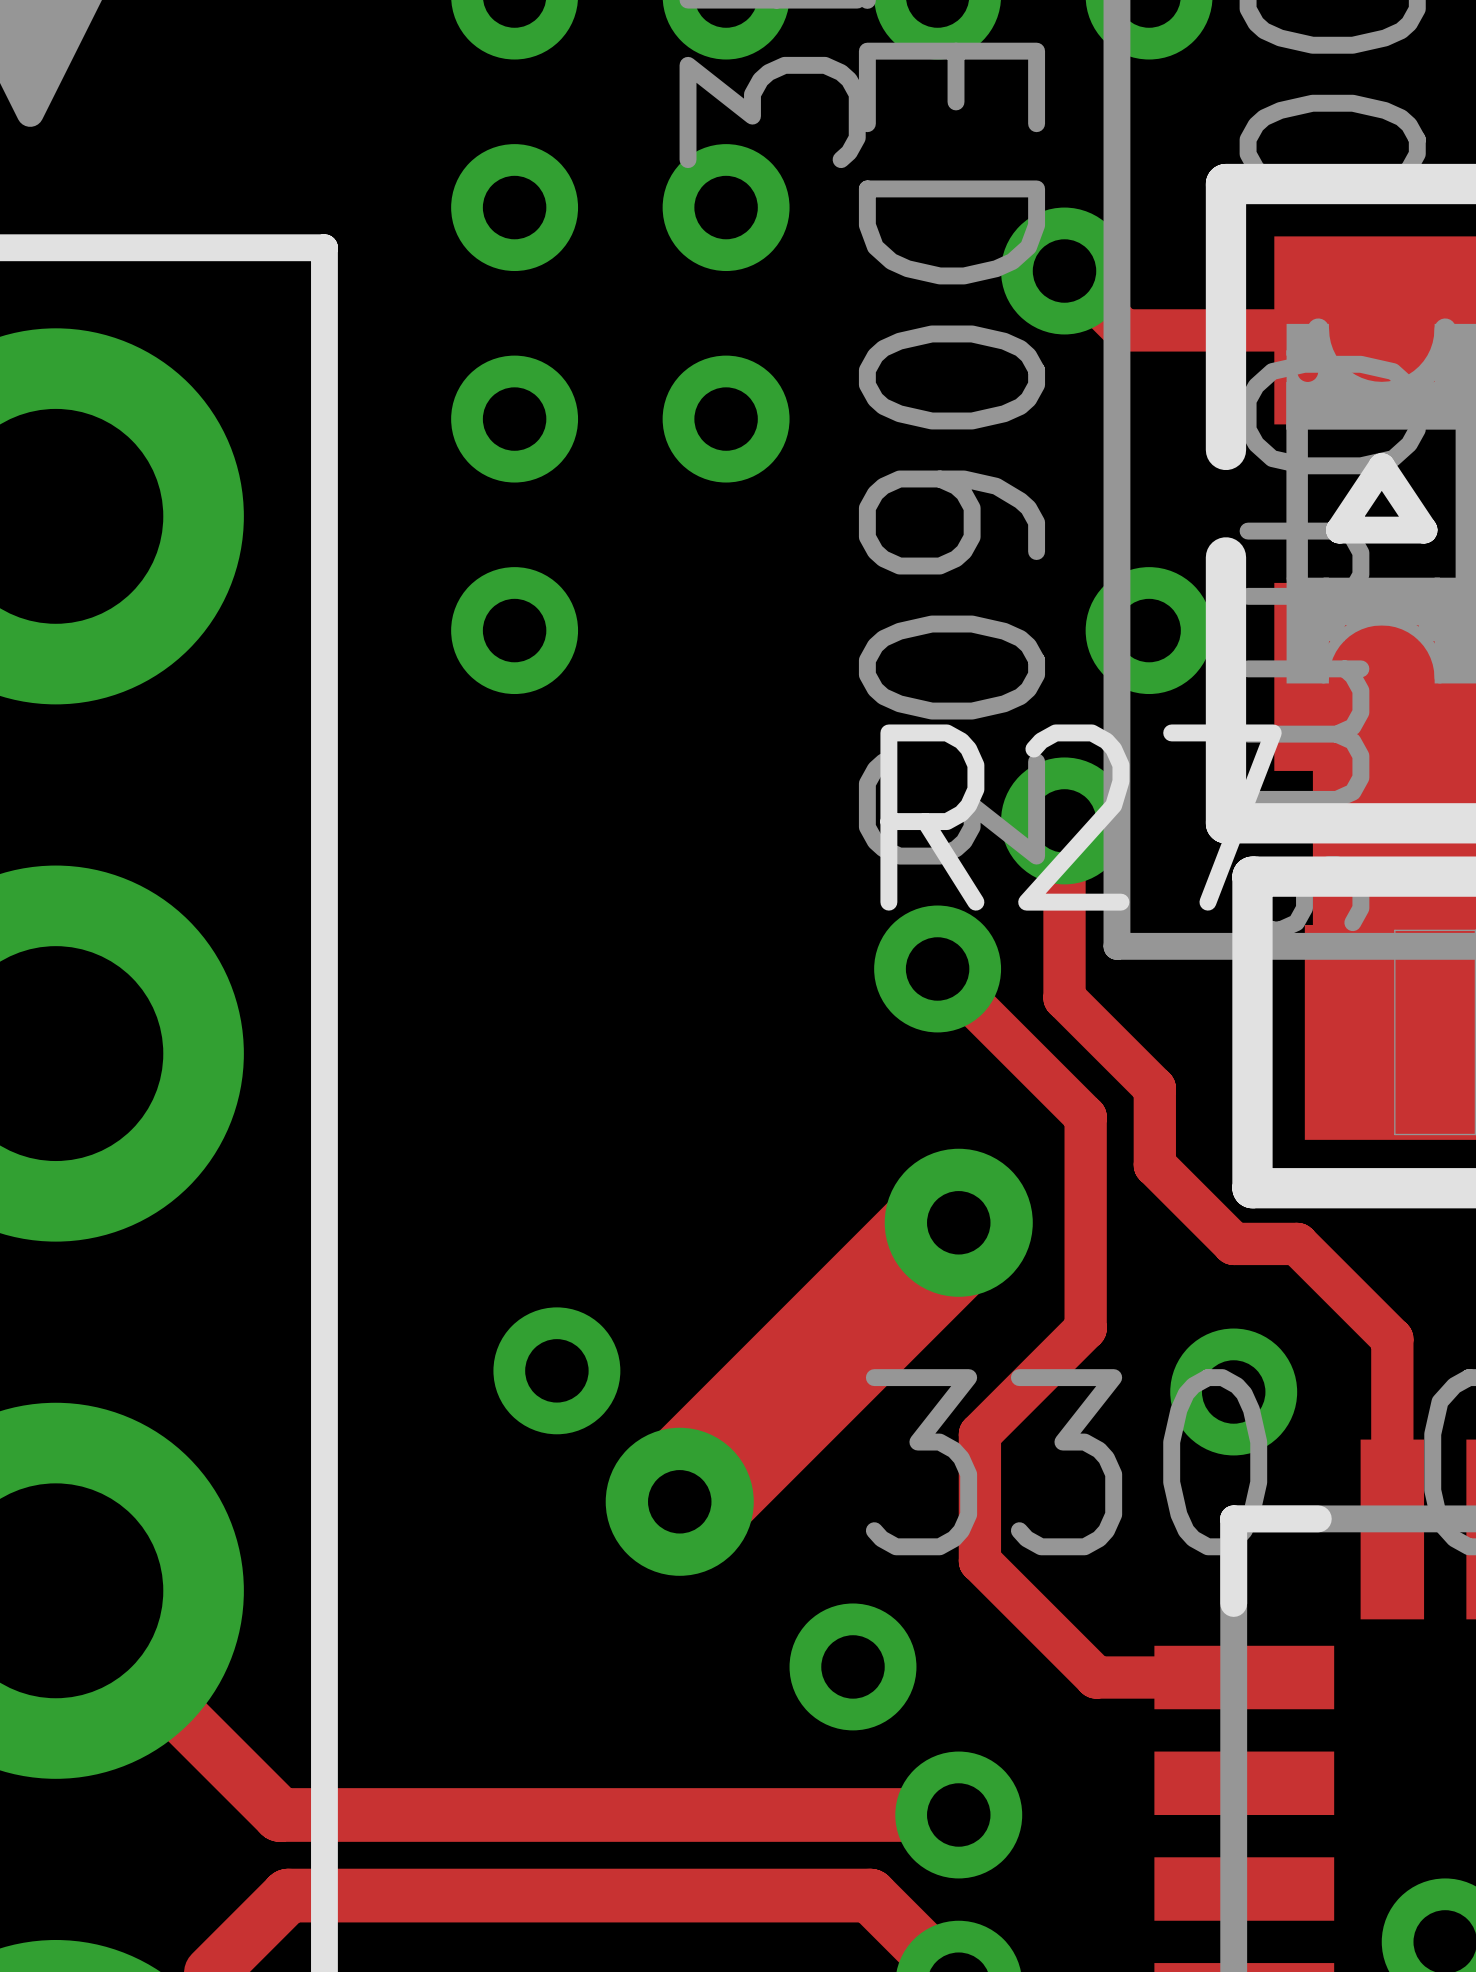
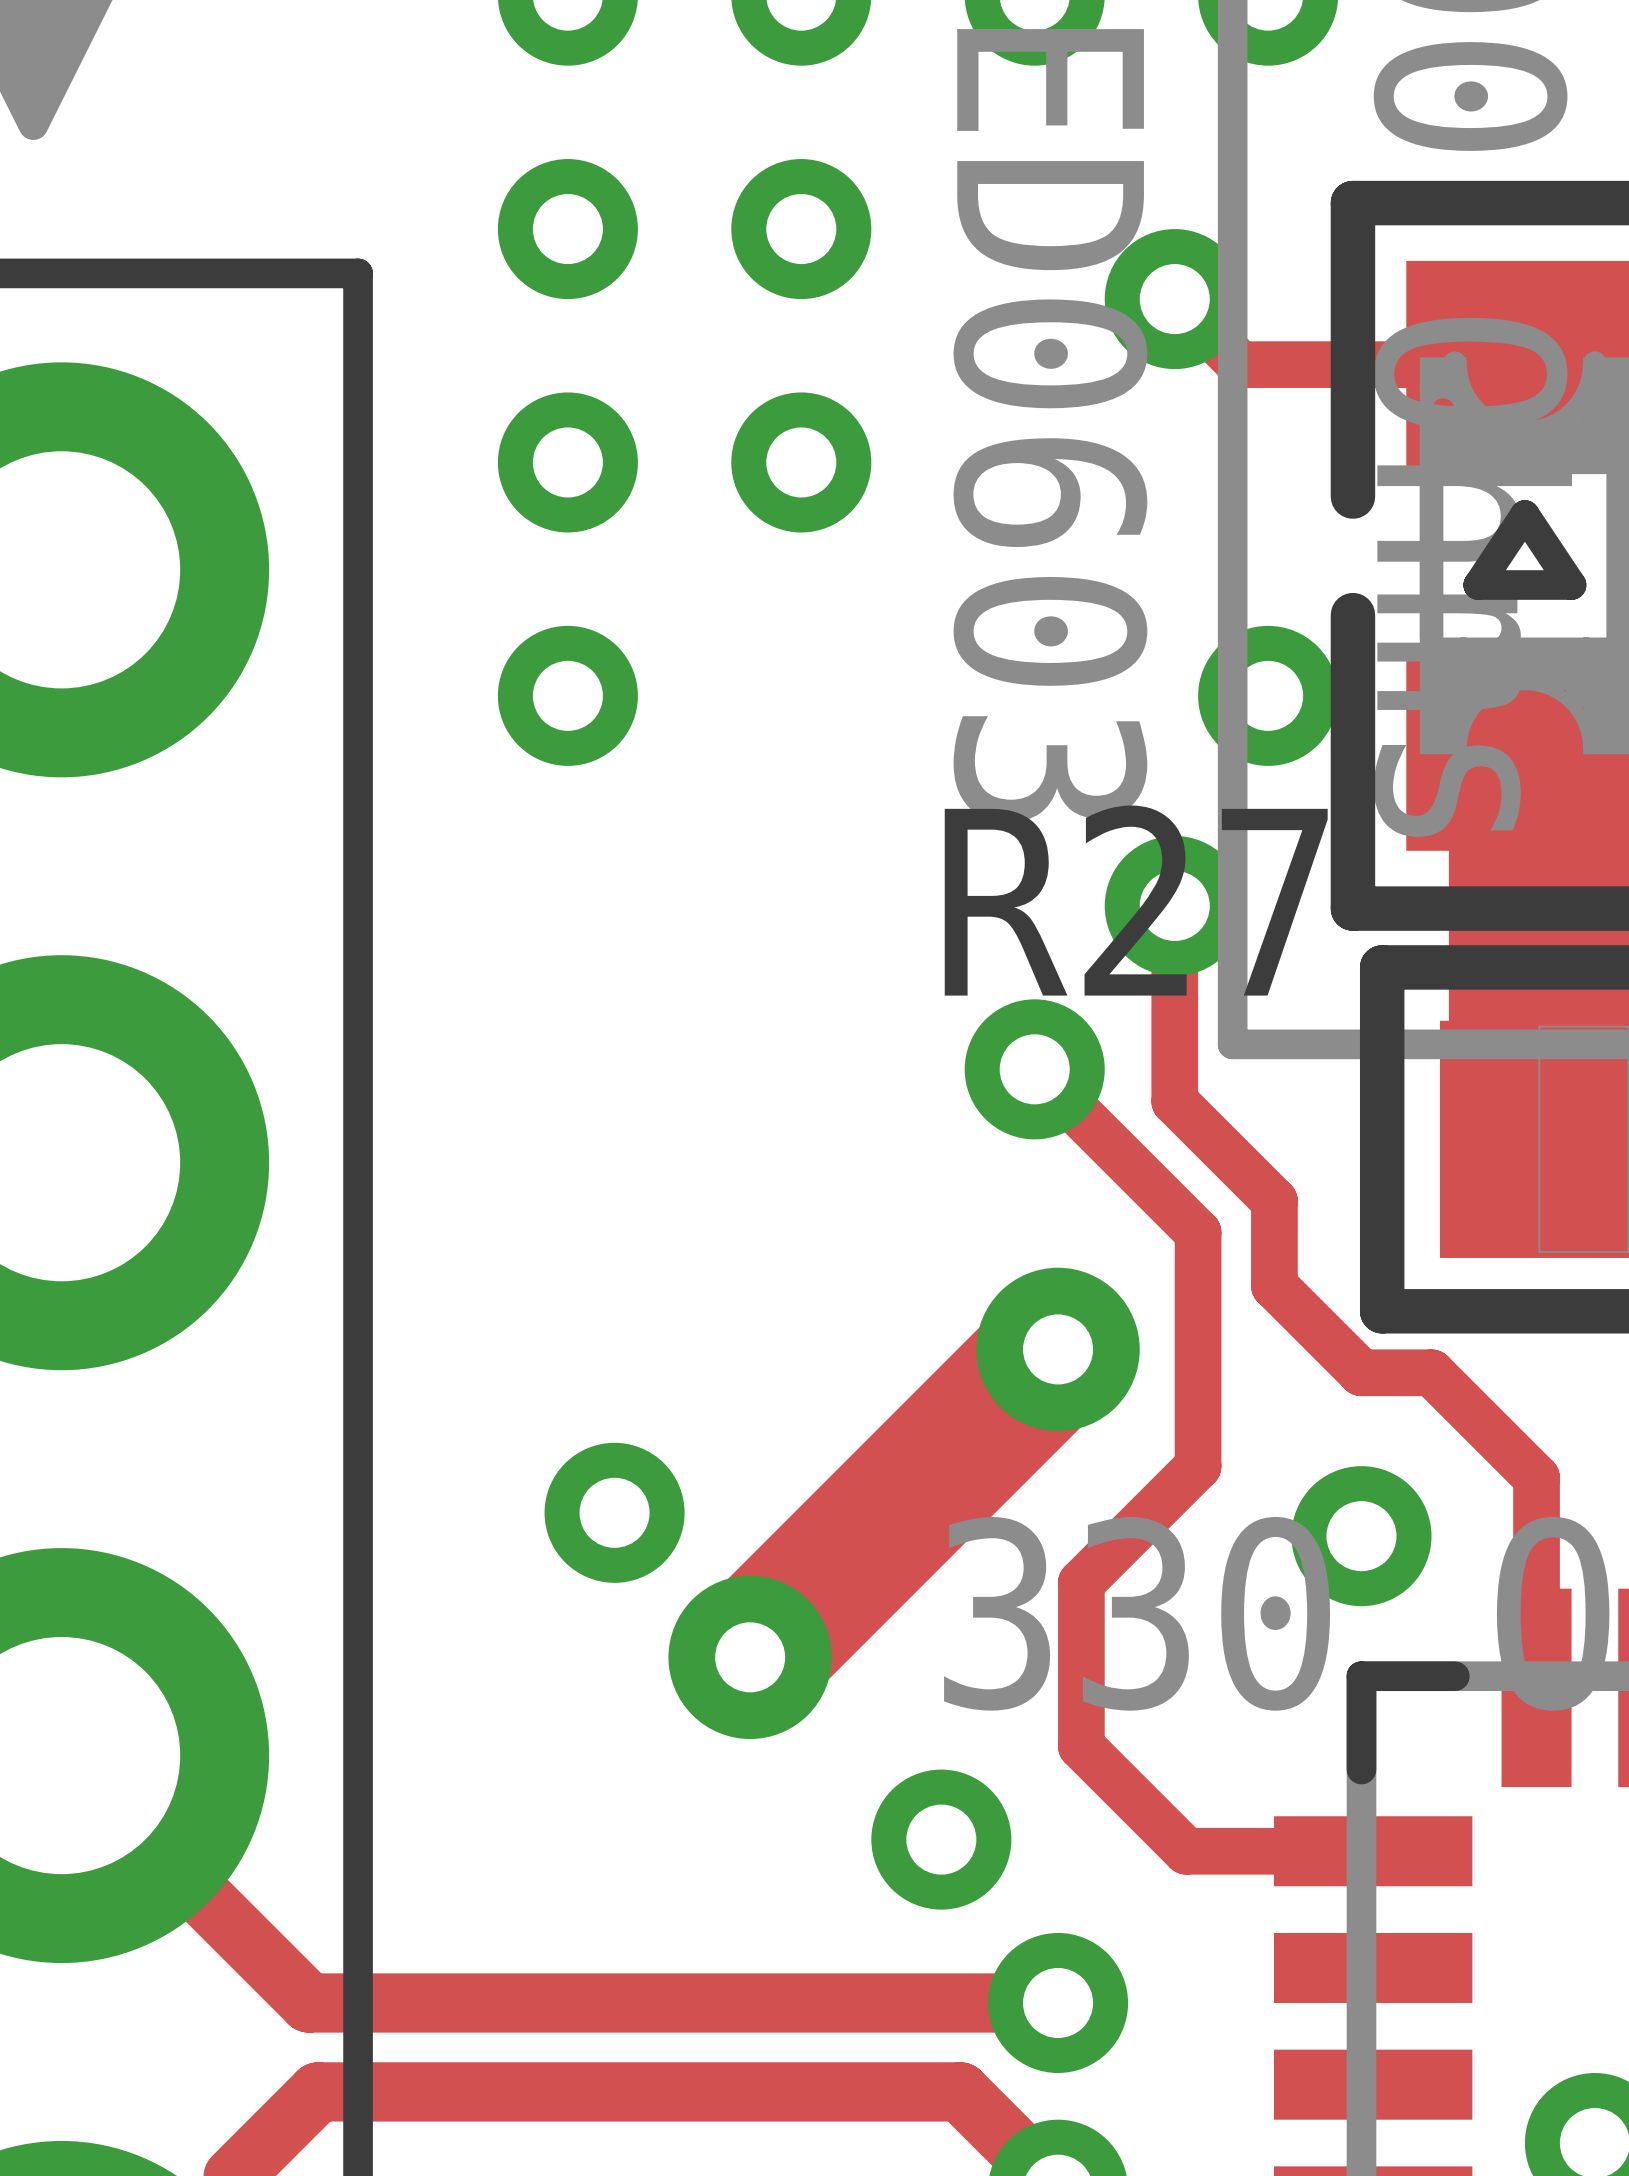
track: (979, 1561) (1096, 1677) -> (1081, 1722) (1081, 1746) (1186, 1851) (1209, 1851)

